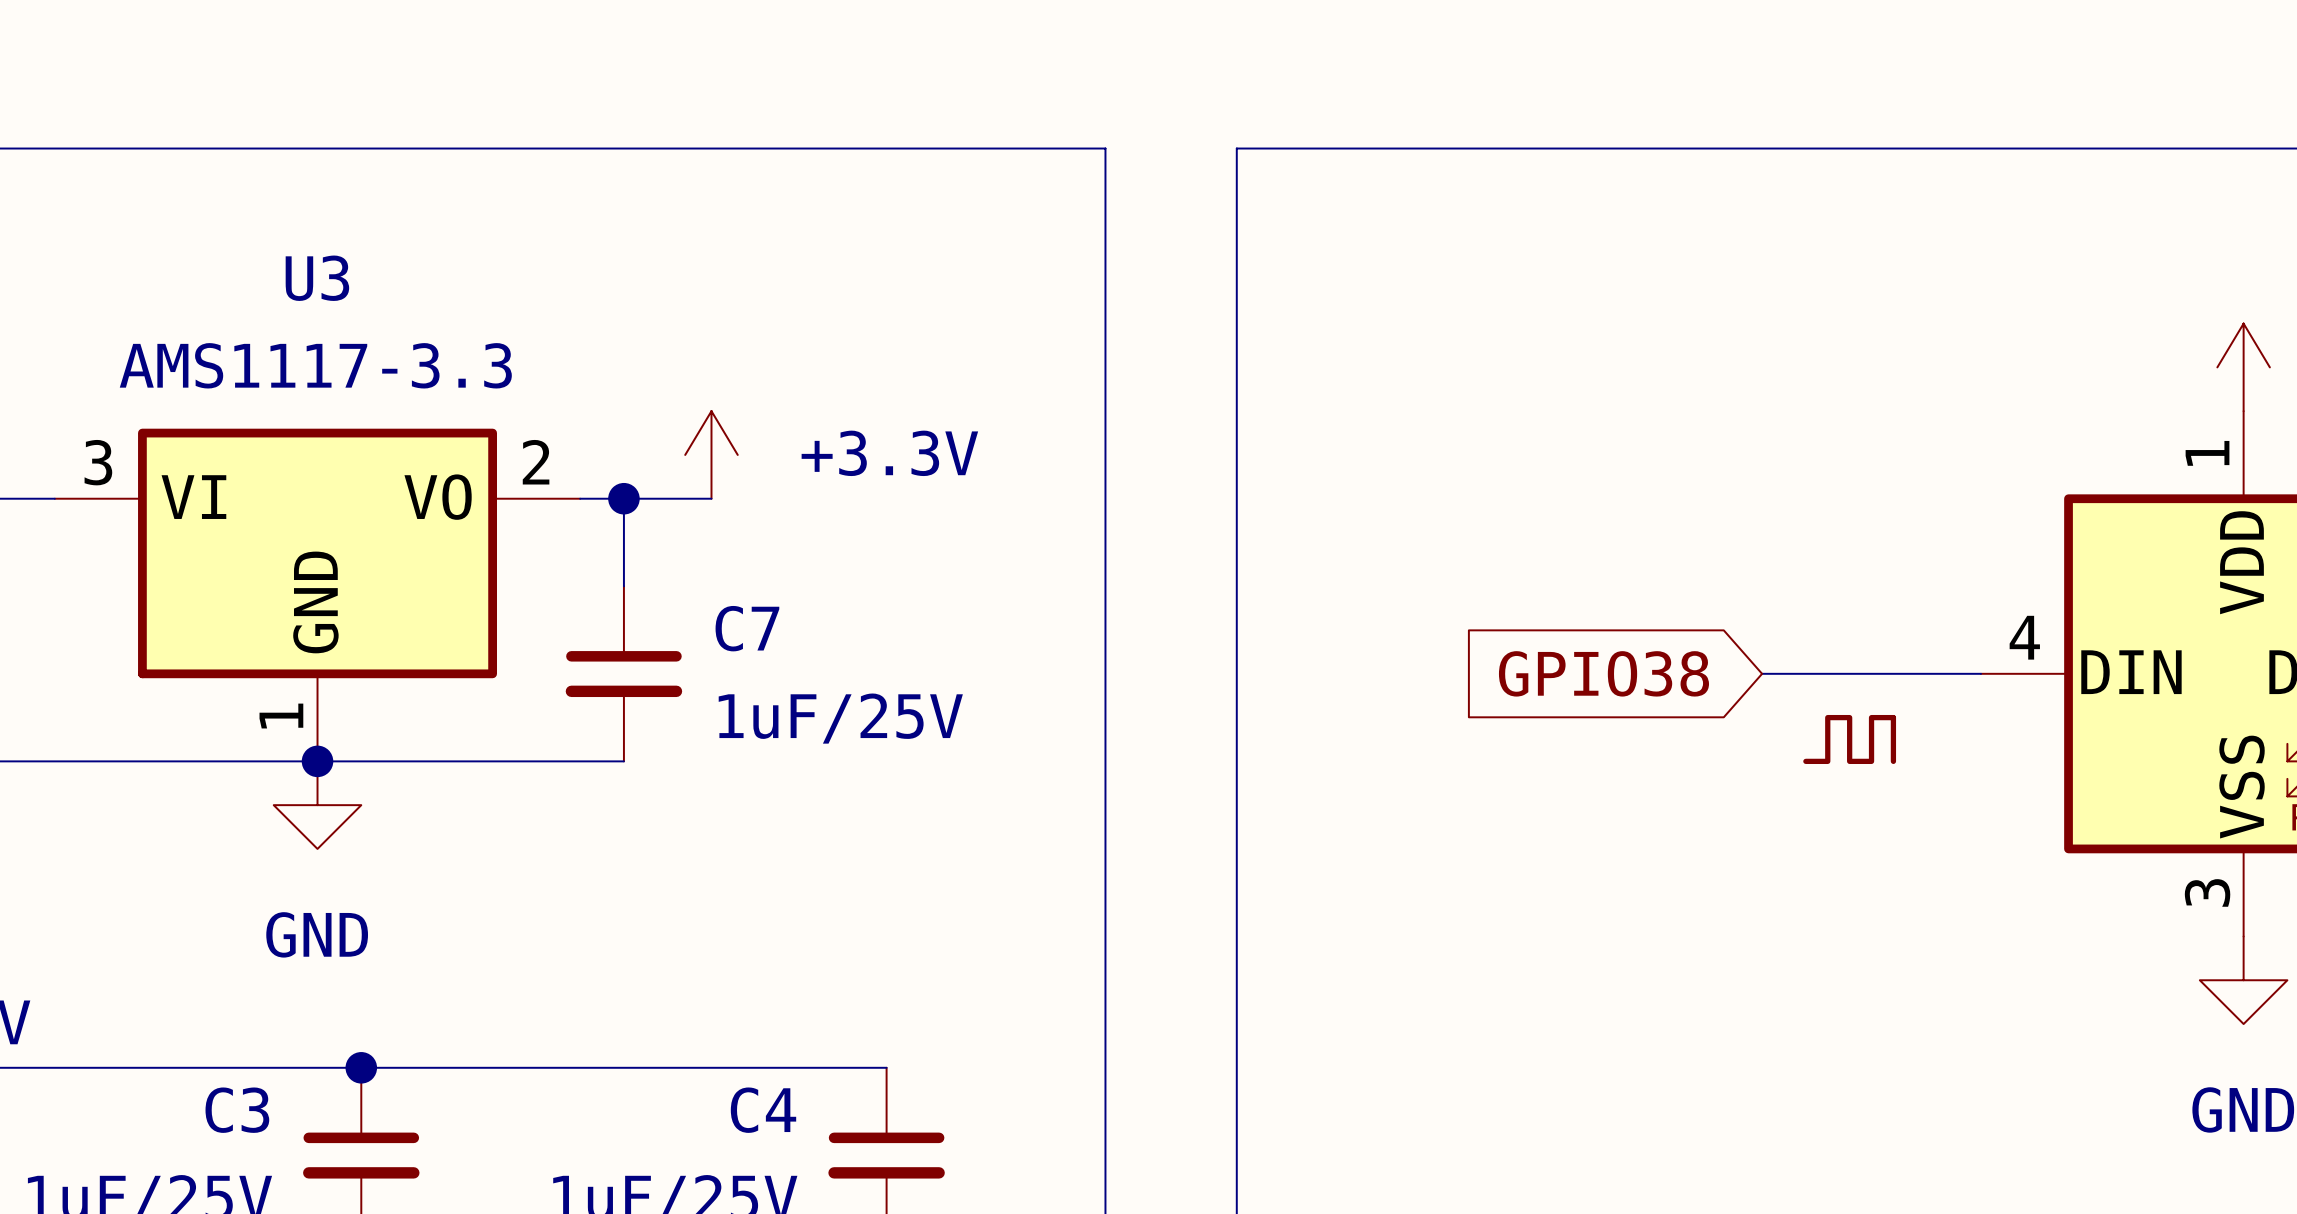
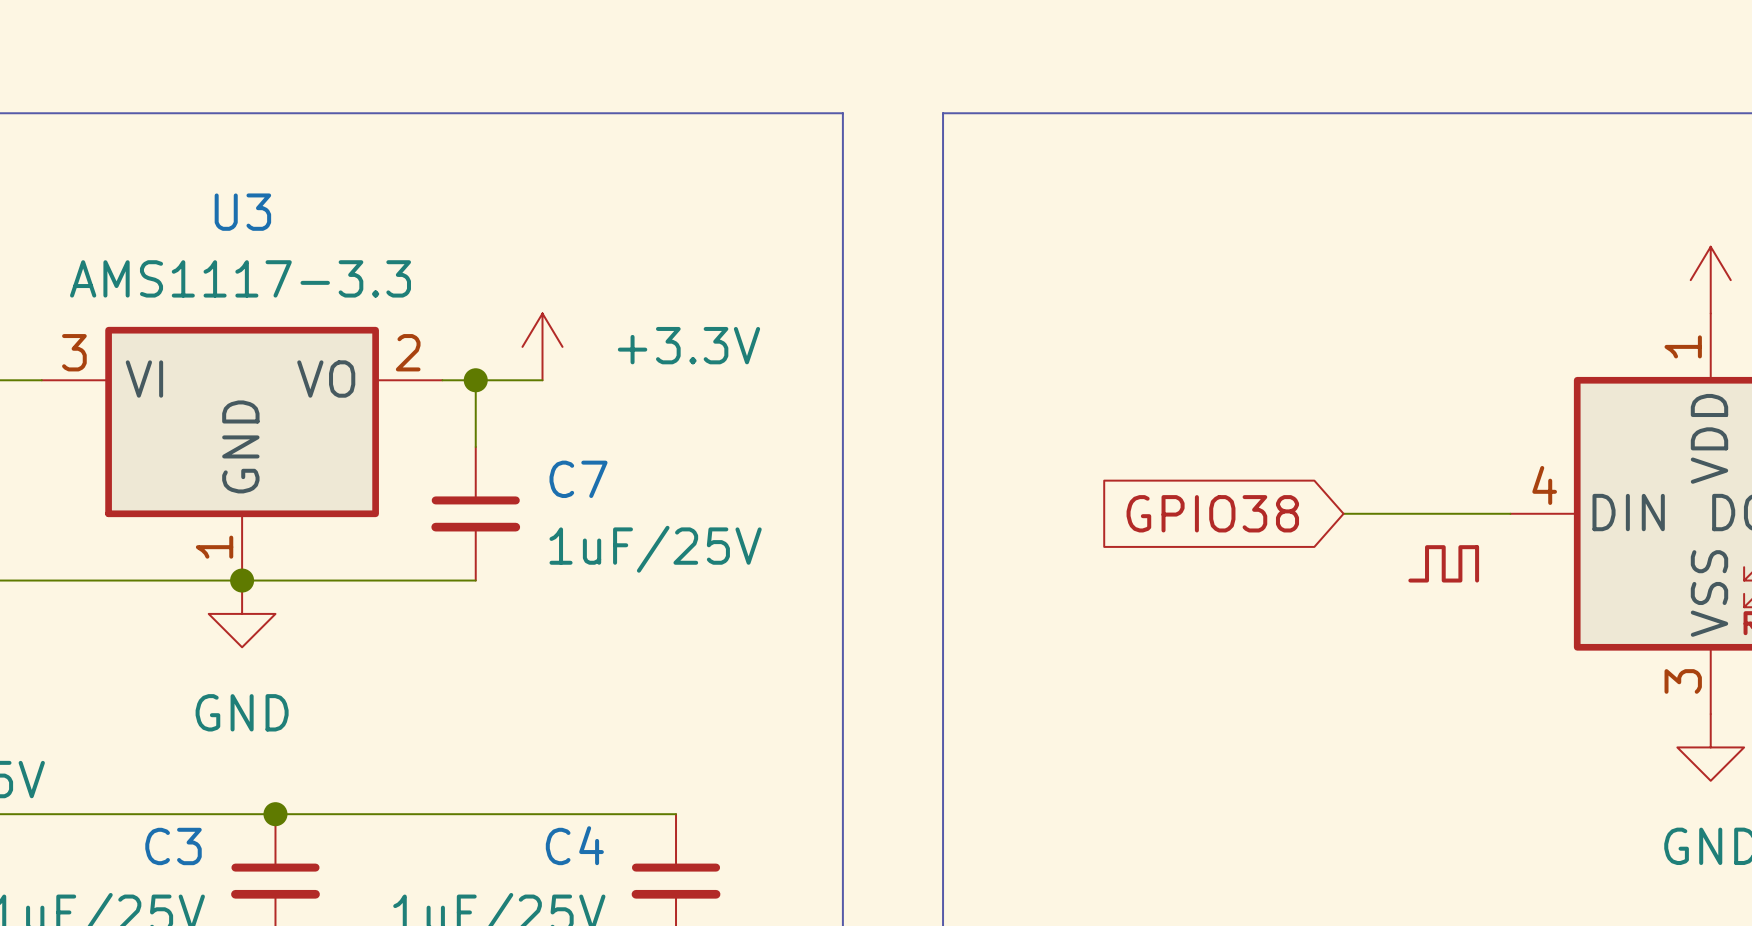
part position: (1849, 739) -> (1443, 563)

